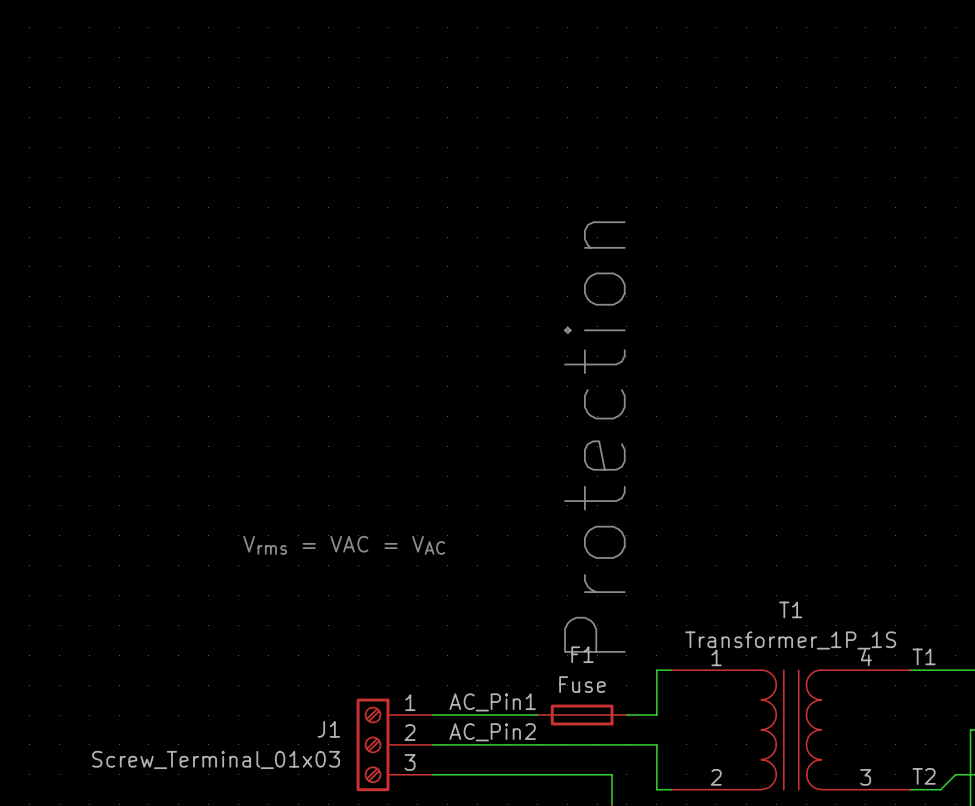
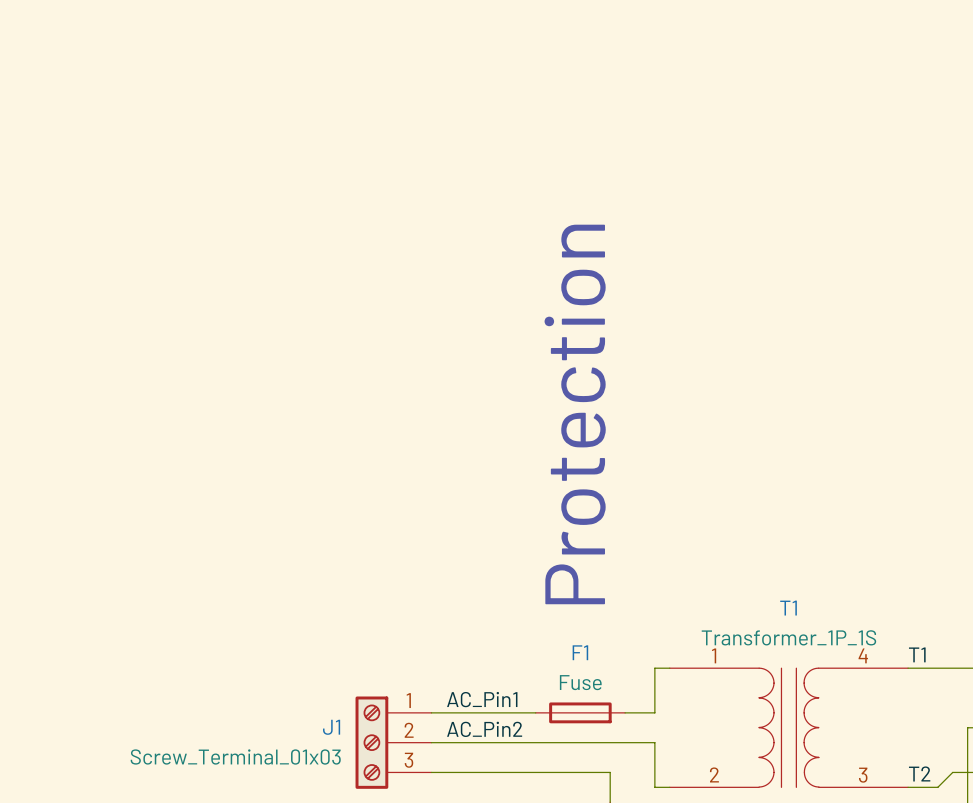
text position: Protection (594, 437) -> Protection (575, 414)
text: Vrms = VAC = VAC (344, 545) -> none

